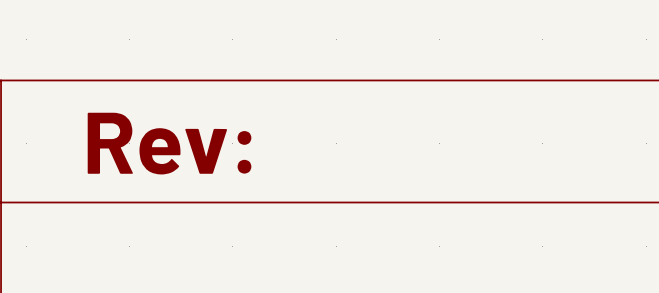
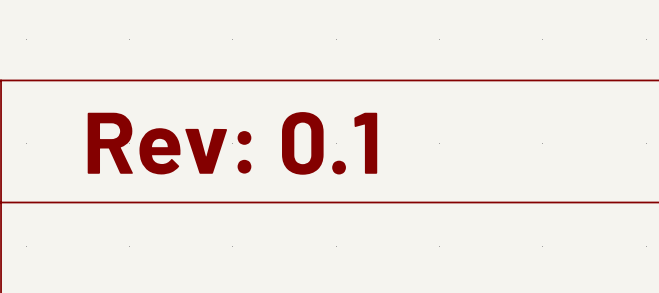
title block: Rev: (169, 143) -> Rev: 0.1 (232, 143)

